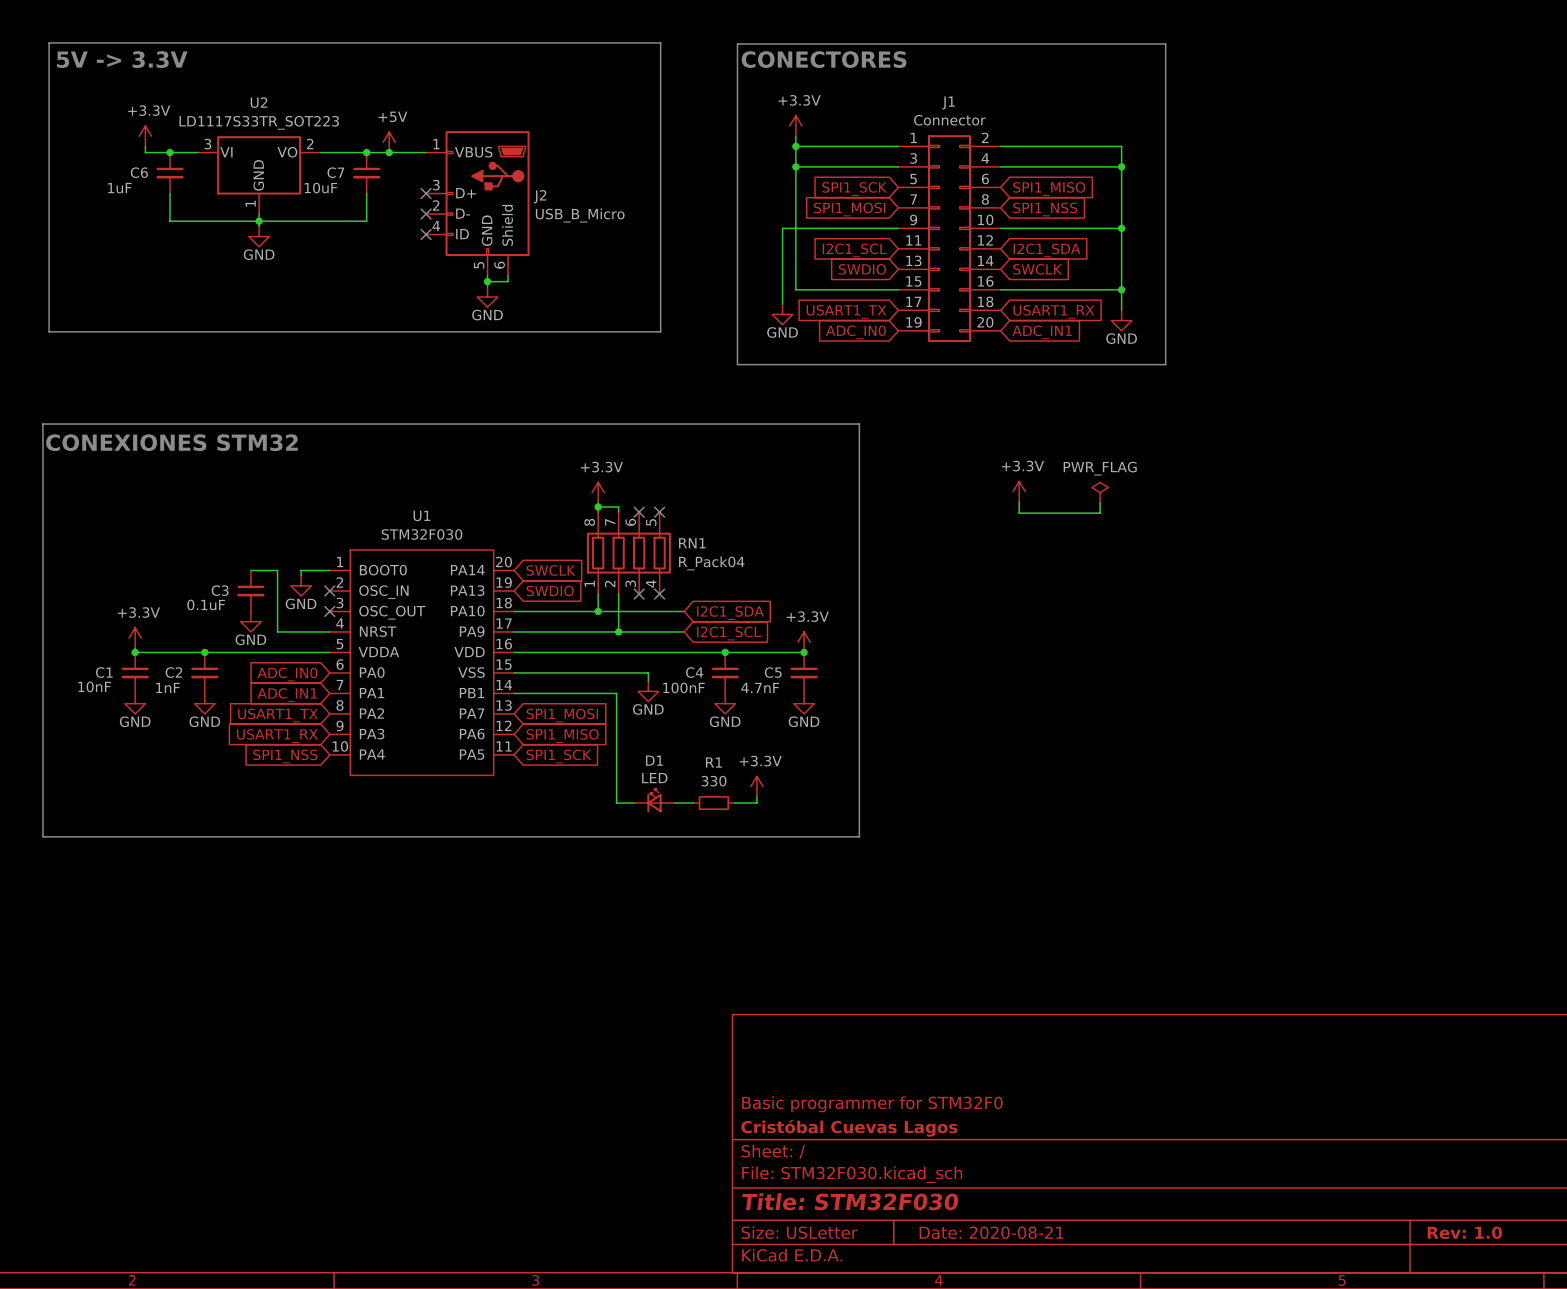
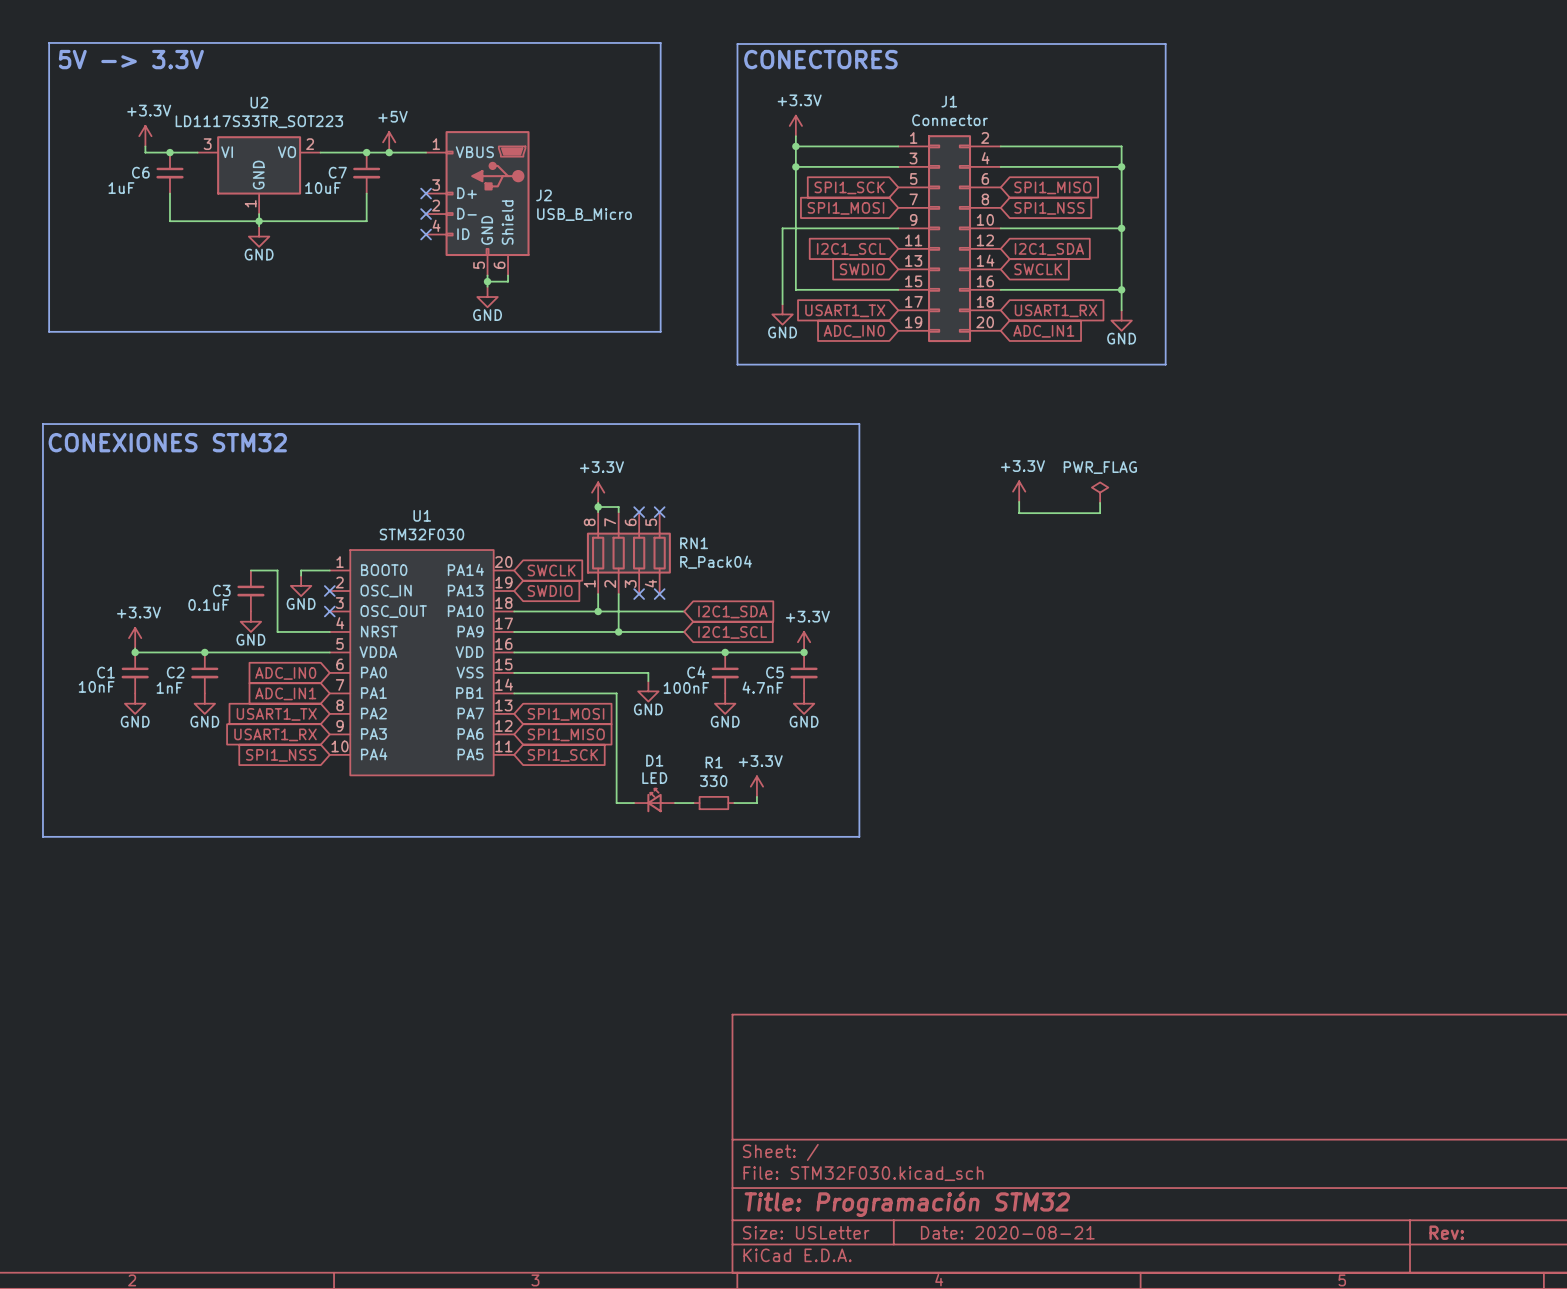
title block: Basic programmer for STM32F0 (872, 1104) -> none
title block: Cristóbal Cuevas Lagos (849, 1128) -> none
title block: Title: STM32F030 (850, 1201) -> Title: Programación STM32 (907, 1204)
title block: Rev: 1.0 (1464, 1232) -> Rev: (1446, 1232)

